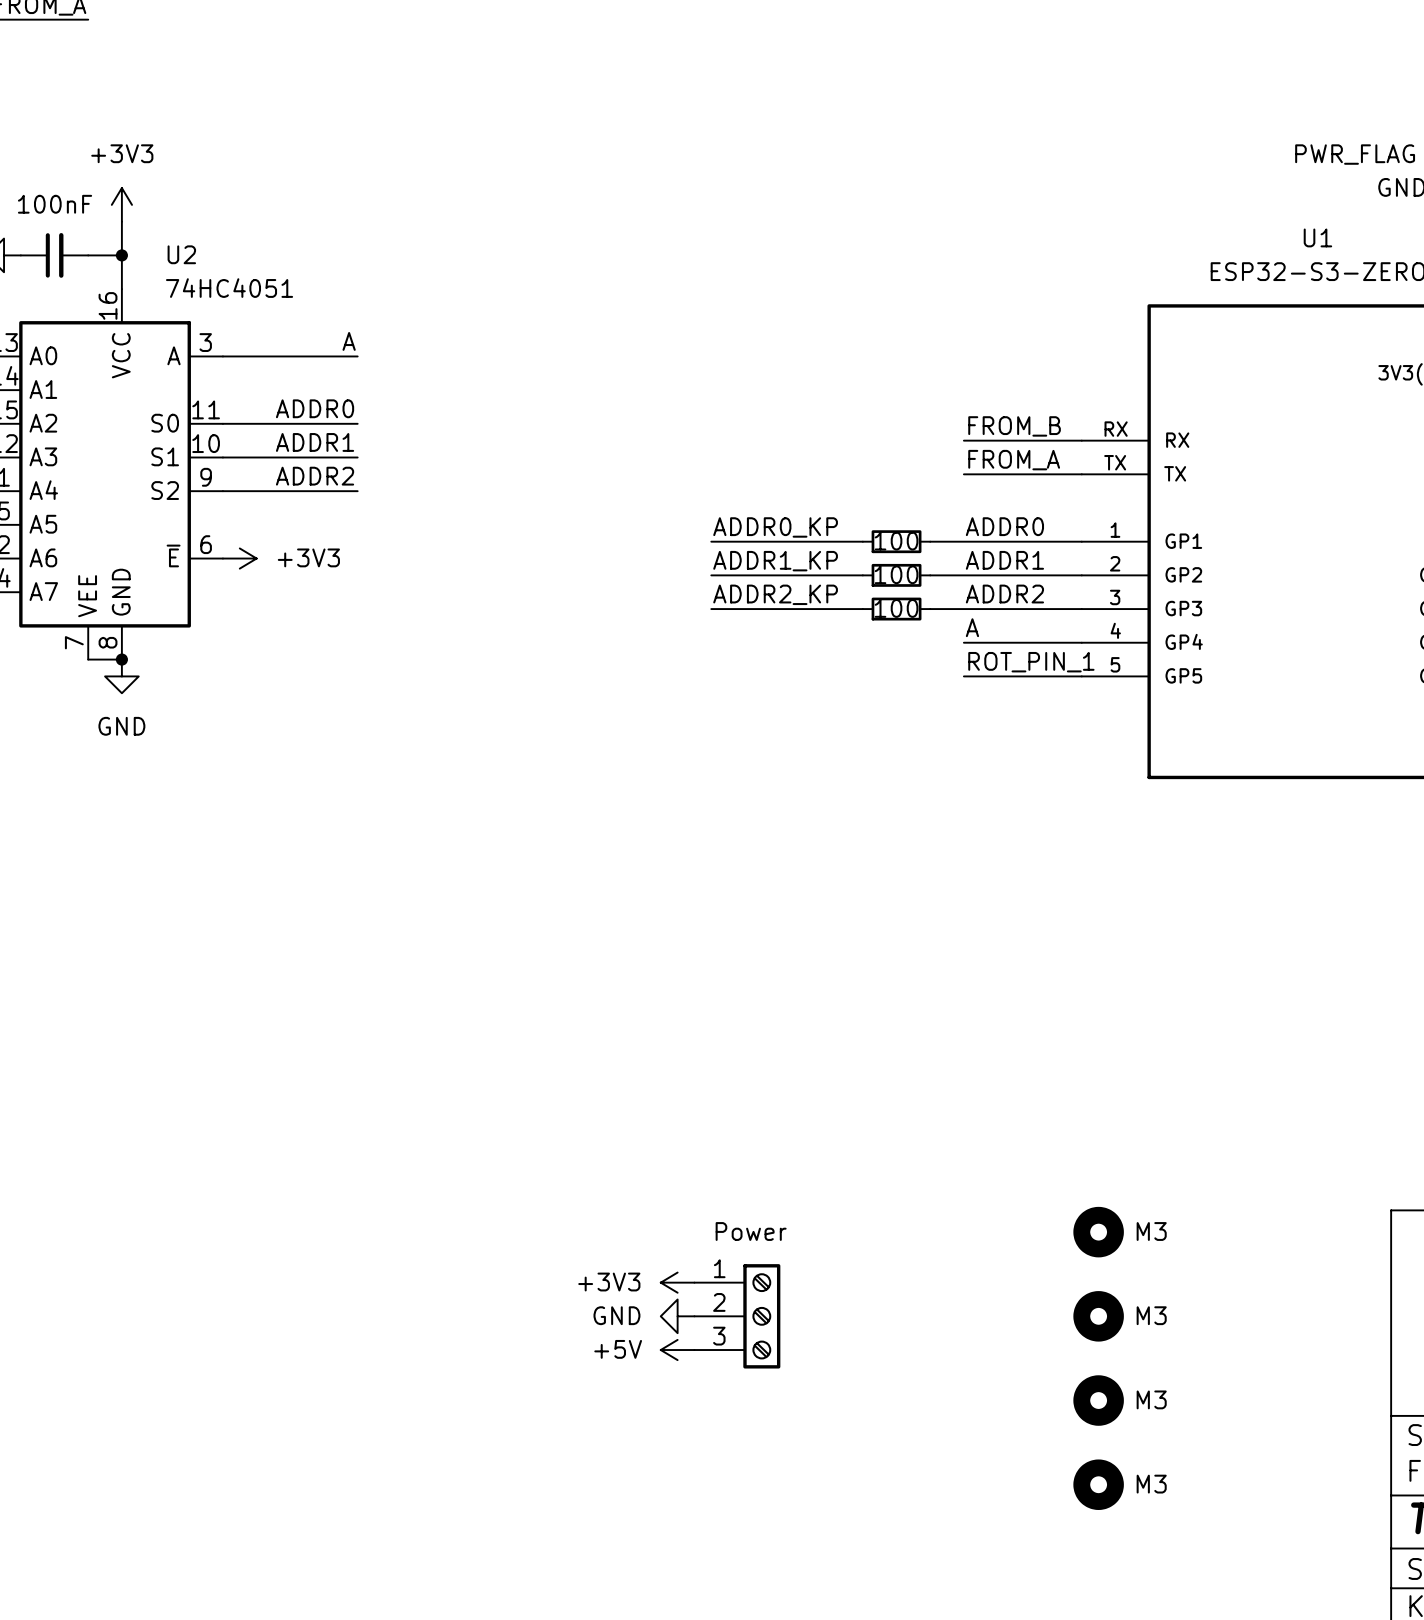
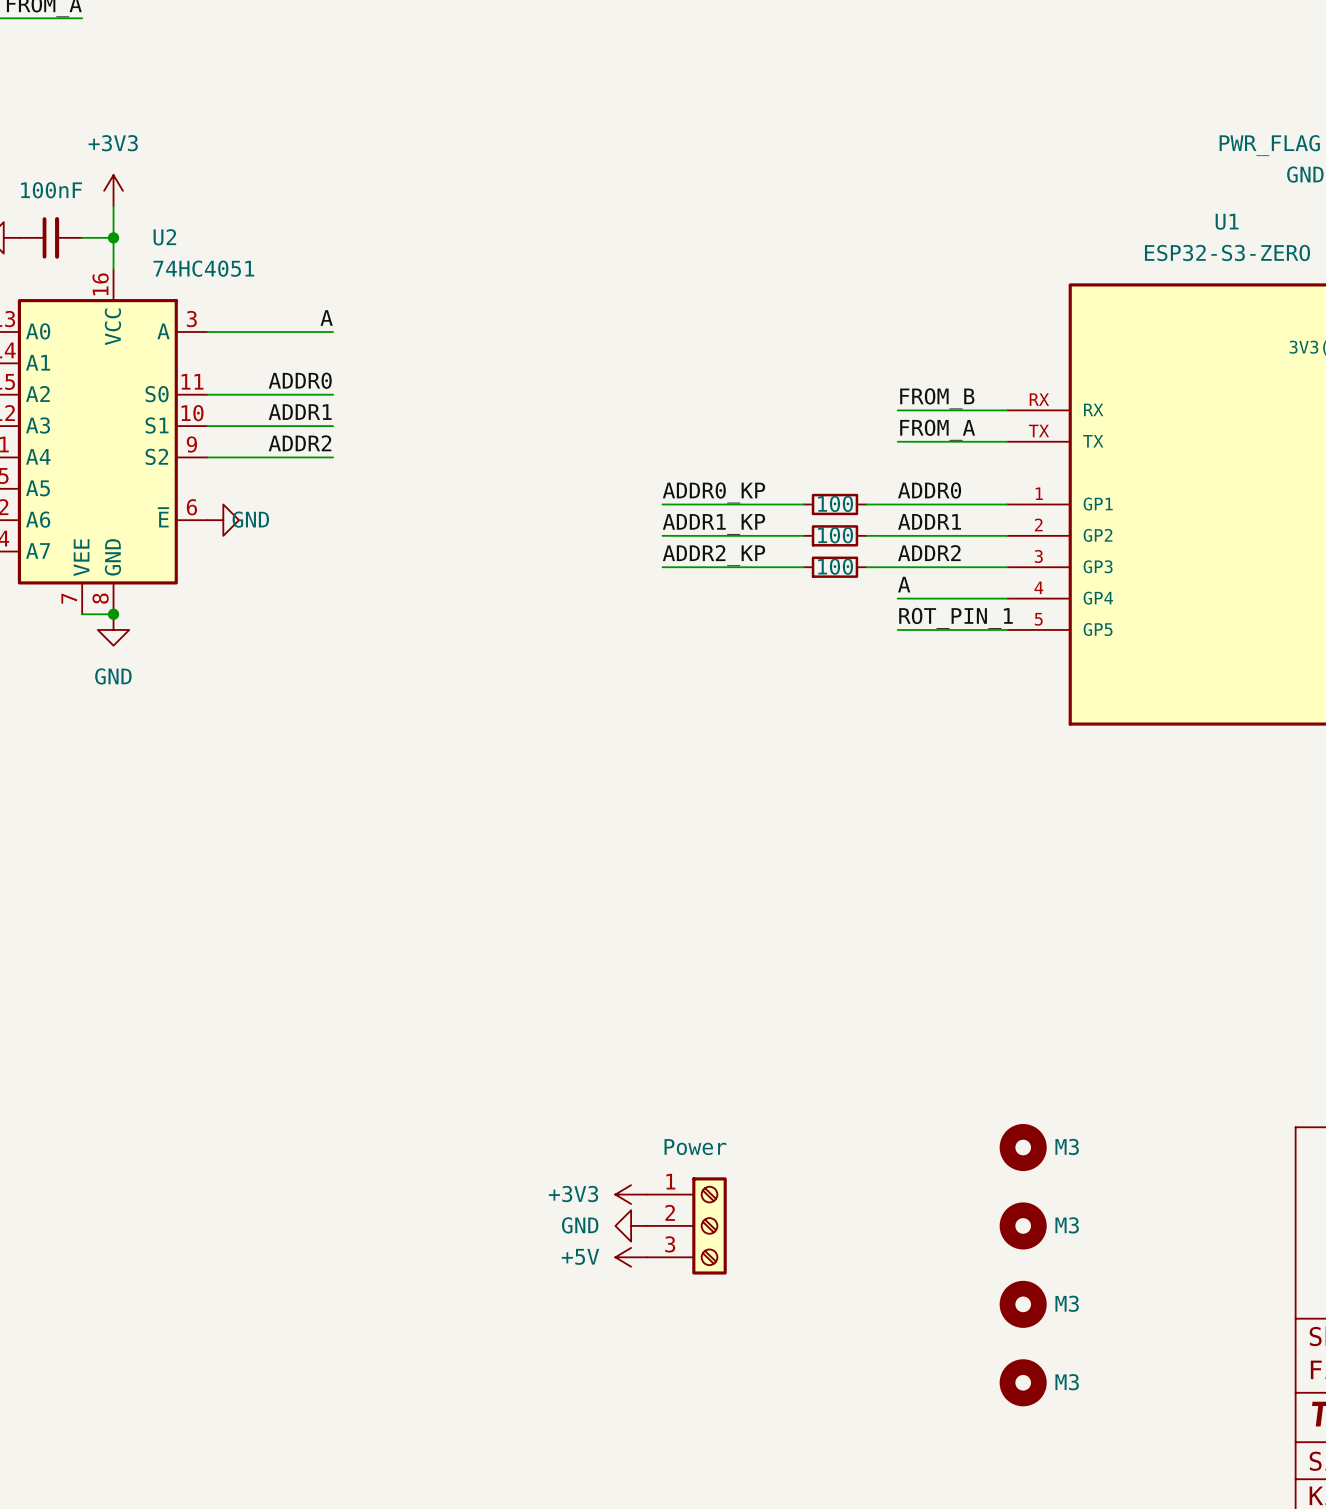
power symbol: +3V3 (239, 558) -> GND (223, 520)

